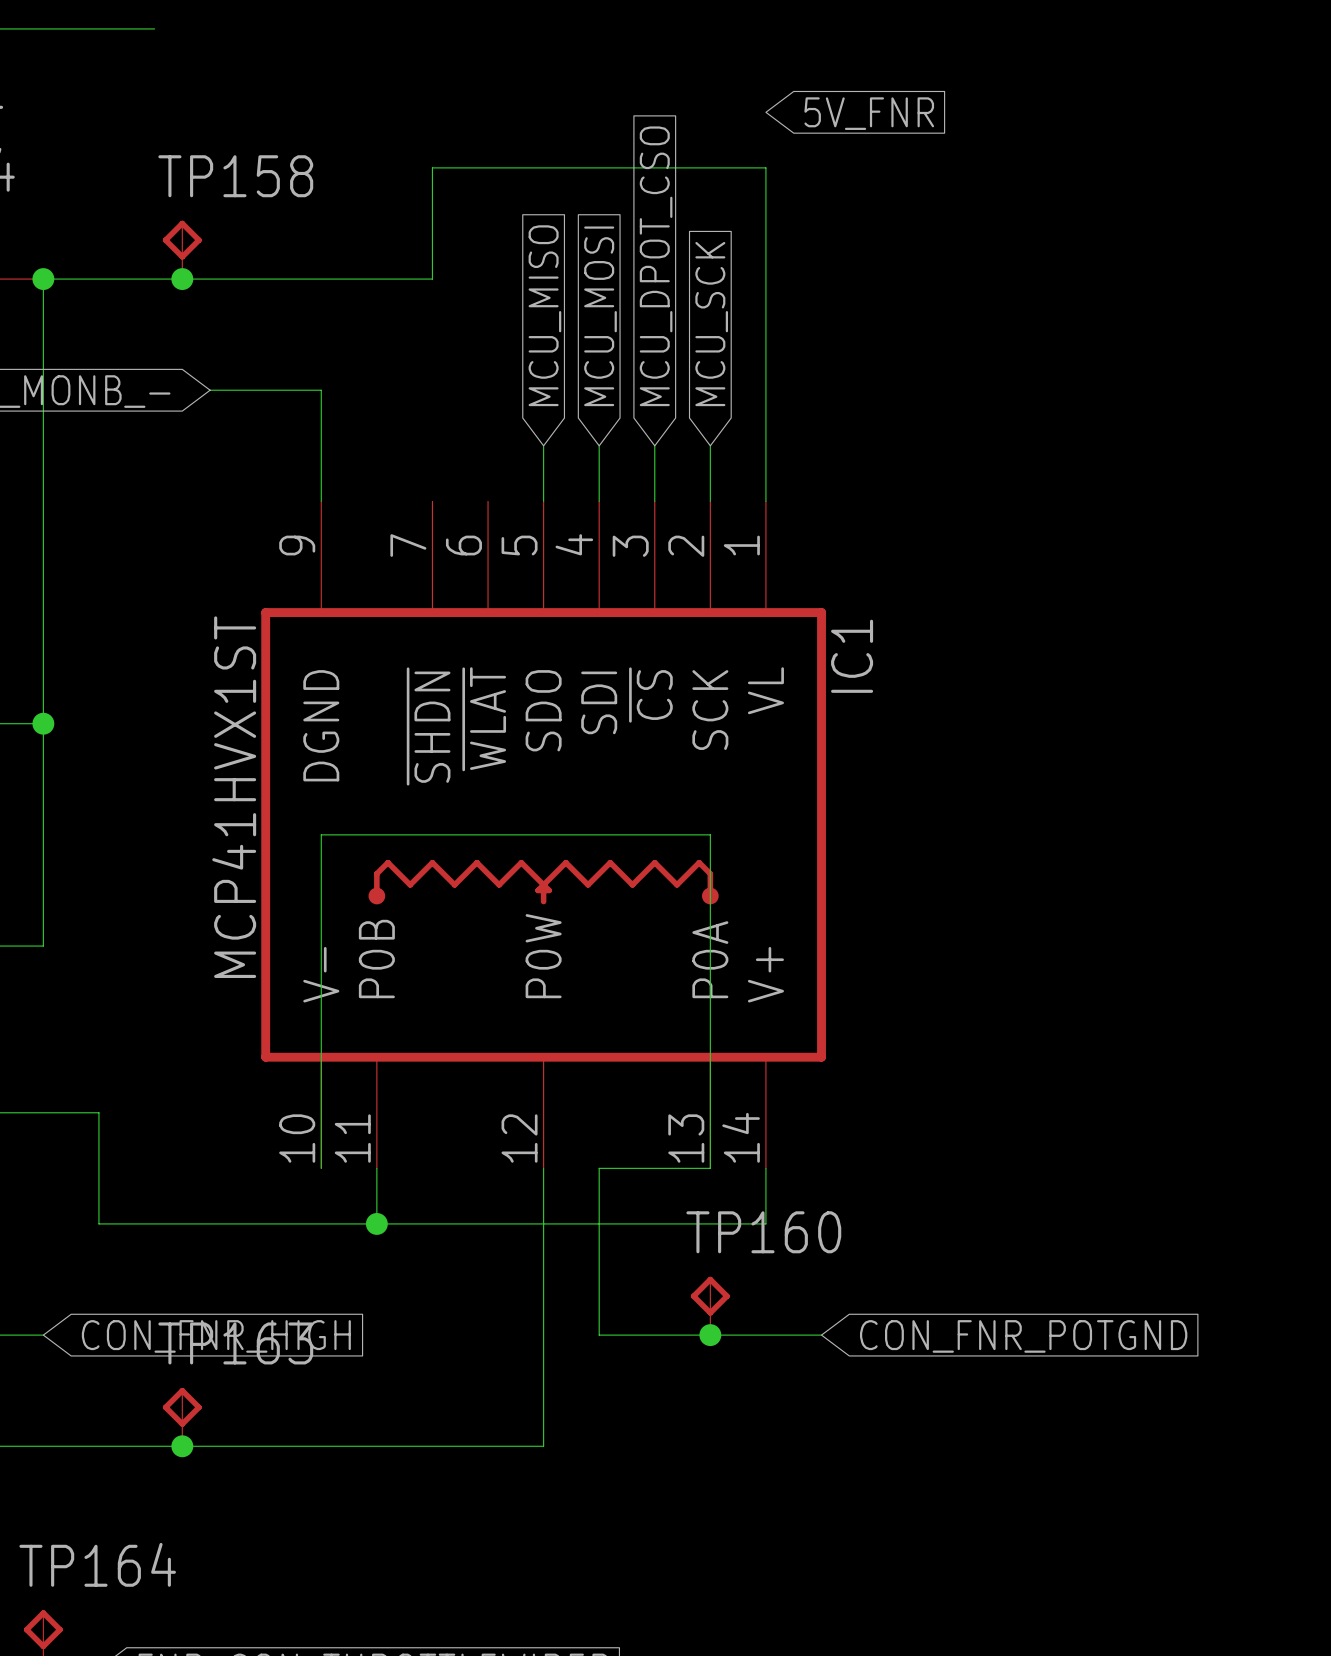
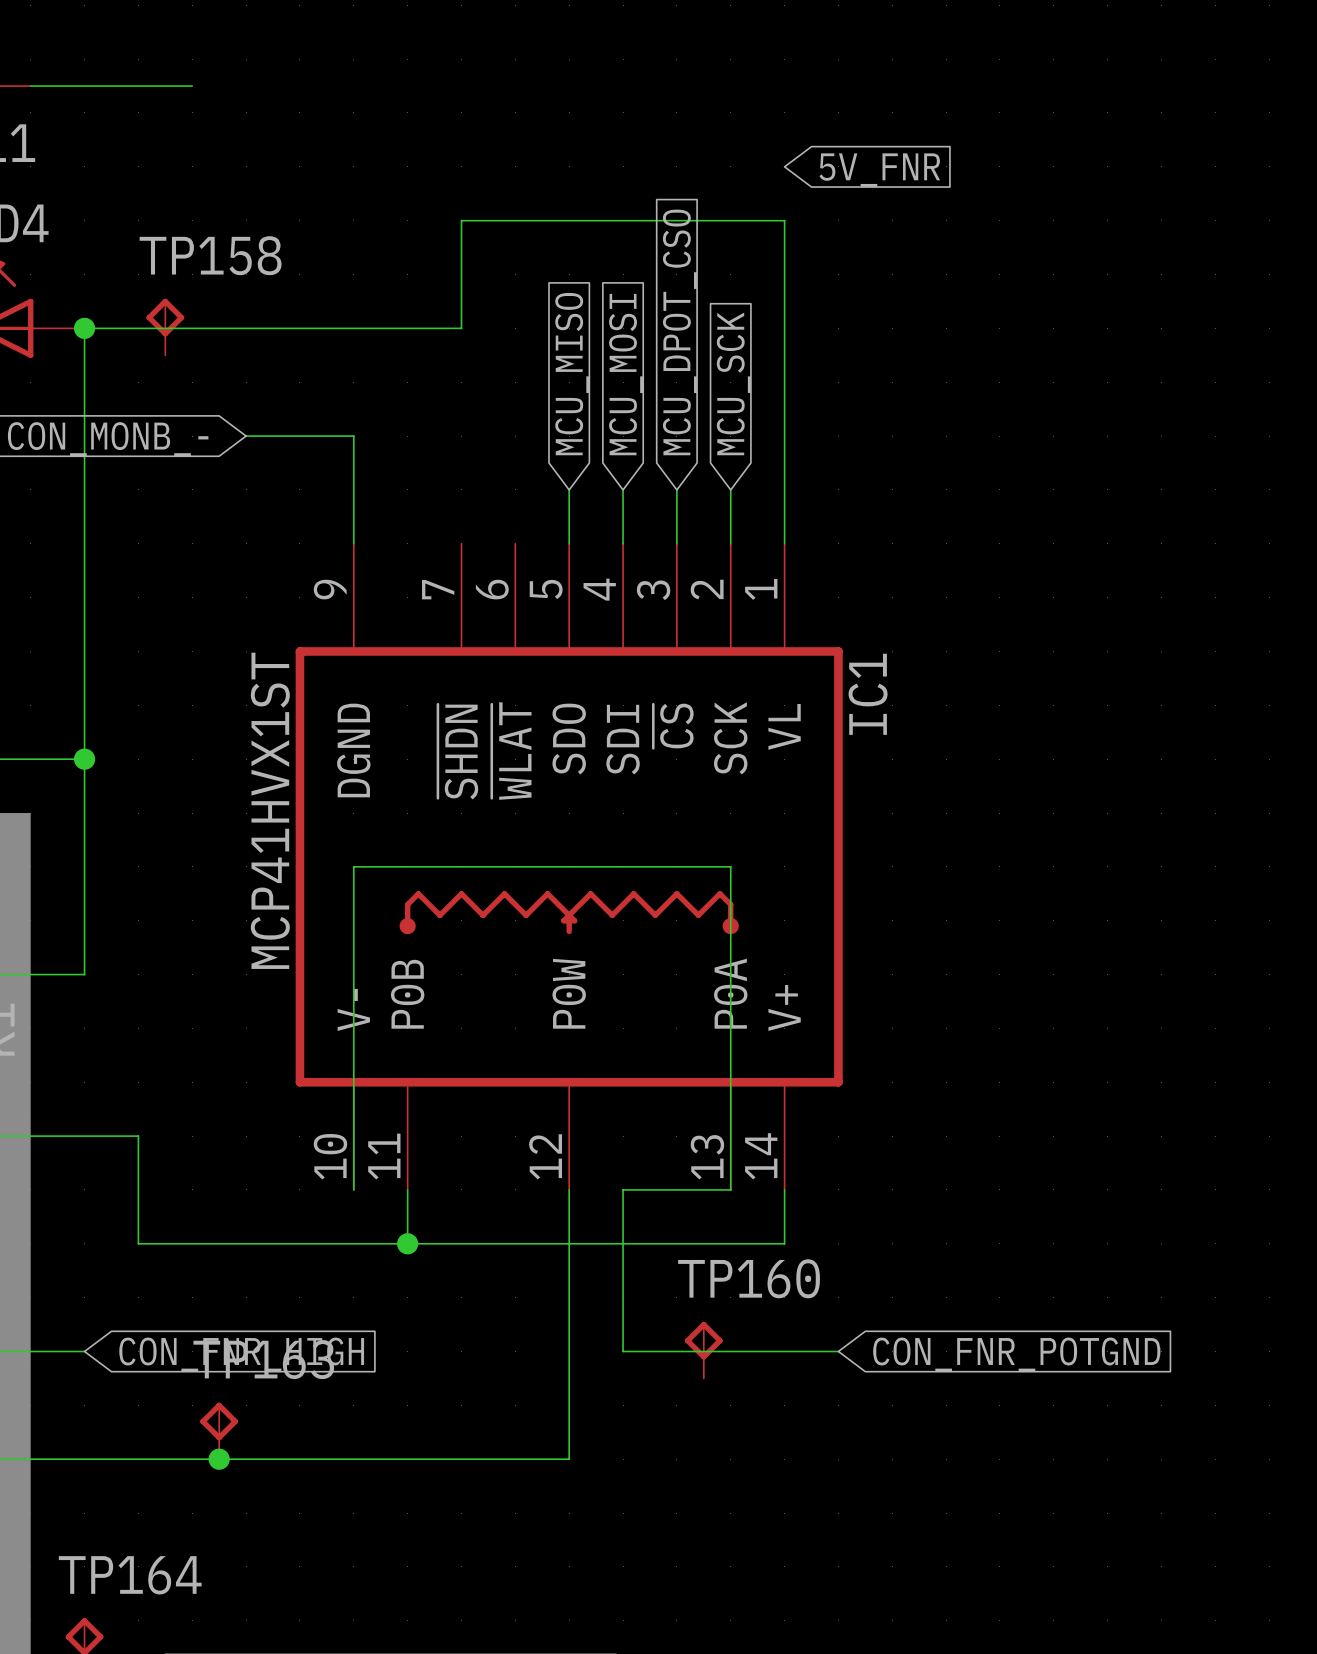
TP158 position: (182, 249) -> (165, 327)
junction: (182, 279) -> none
TP160 position: (710, 1305) -> (703, 1350)
junction: (710, 1335) -> none

